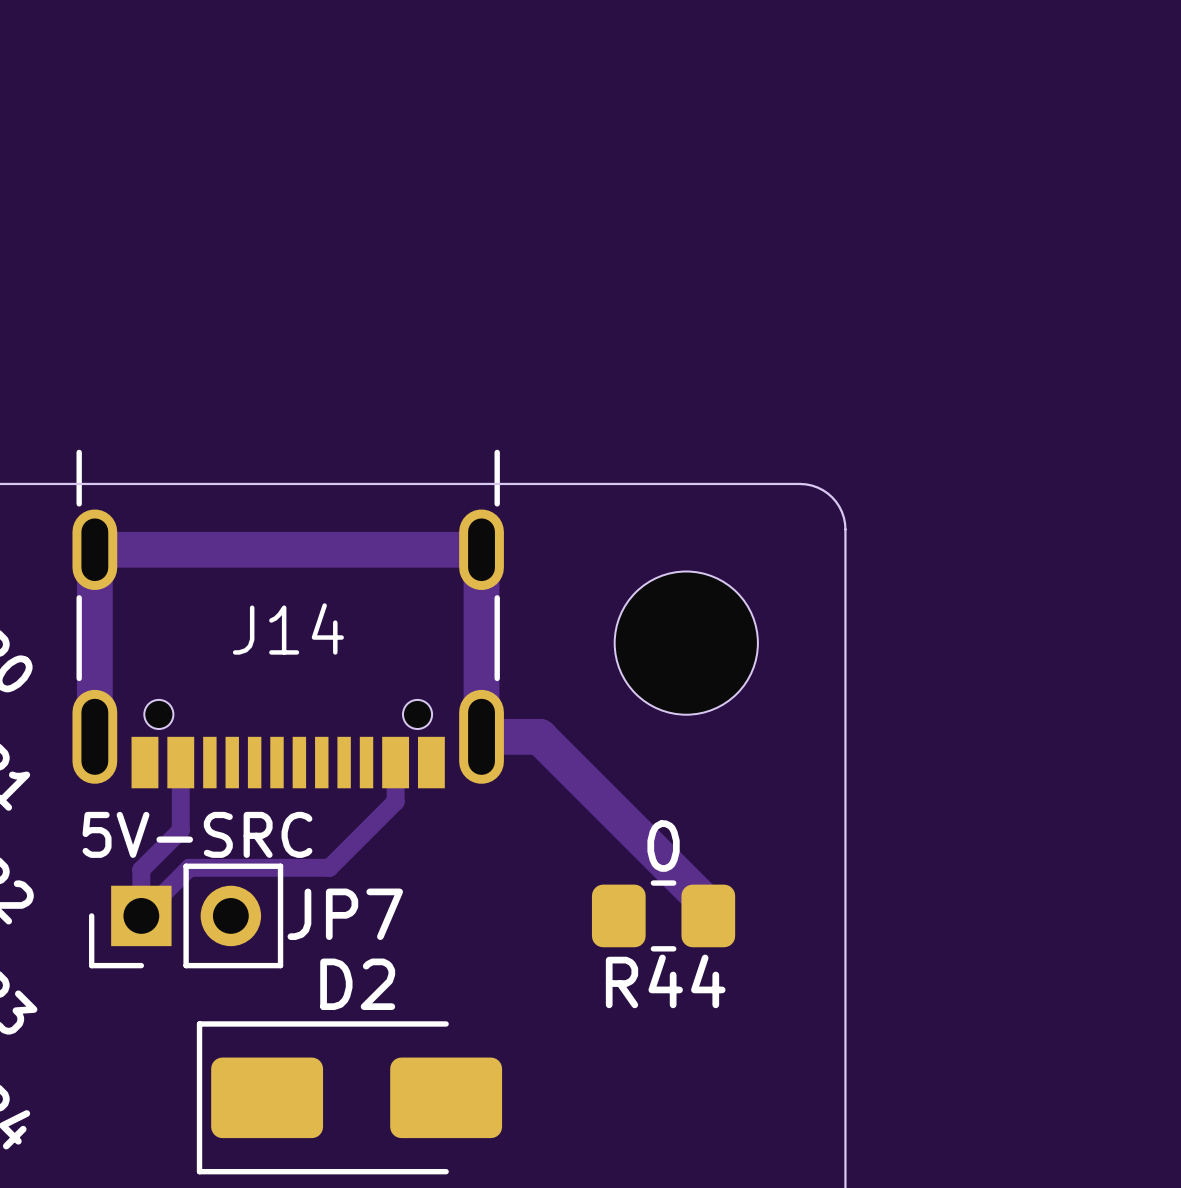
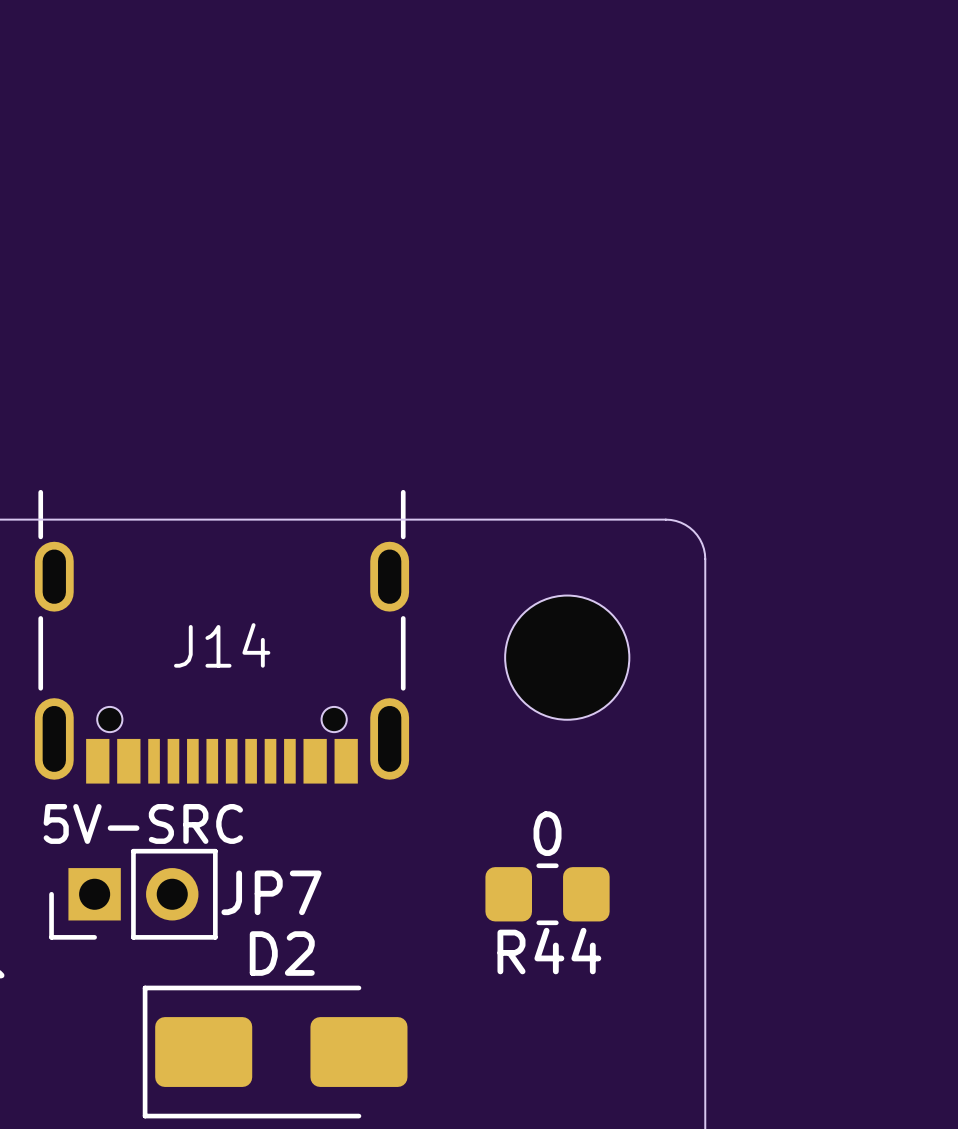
track: (94, 736) (94, 549) (481, 549) (481, 736) (539, 736) (708, 905) (708, 915) -> none
track: (180, 762) (180, 830) (141, 869) (141, 915) (189, 867) (329, 867) (395, 801) (395, 762) -> none

